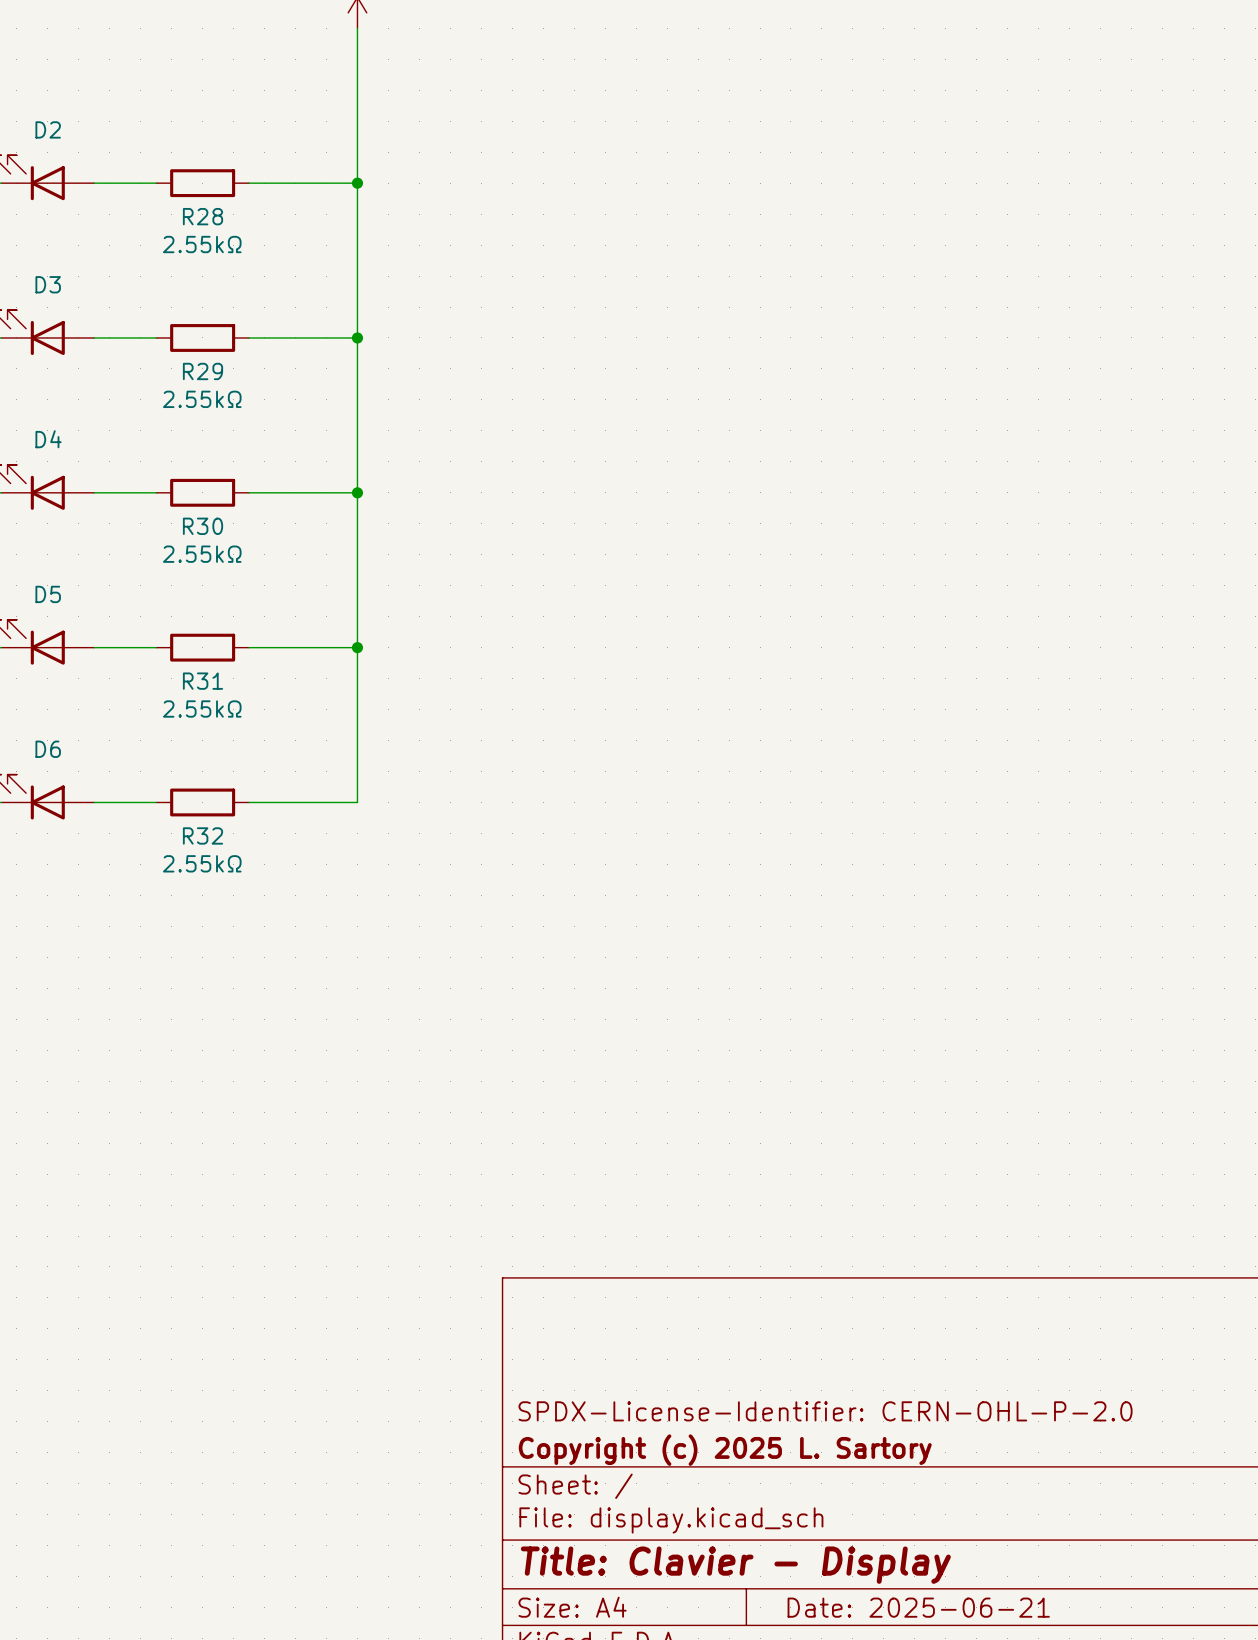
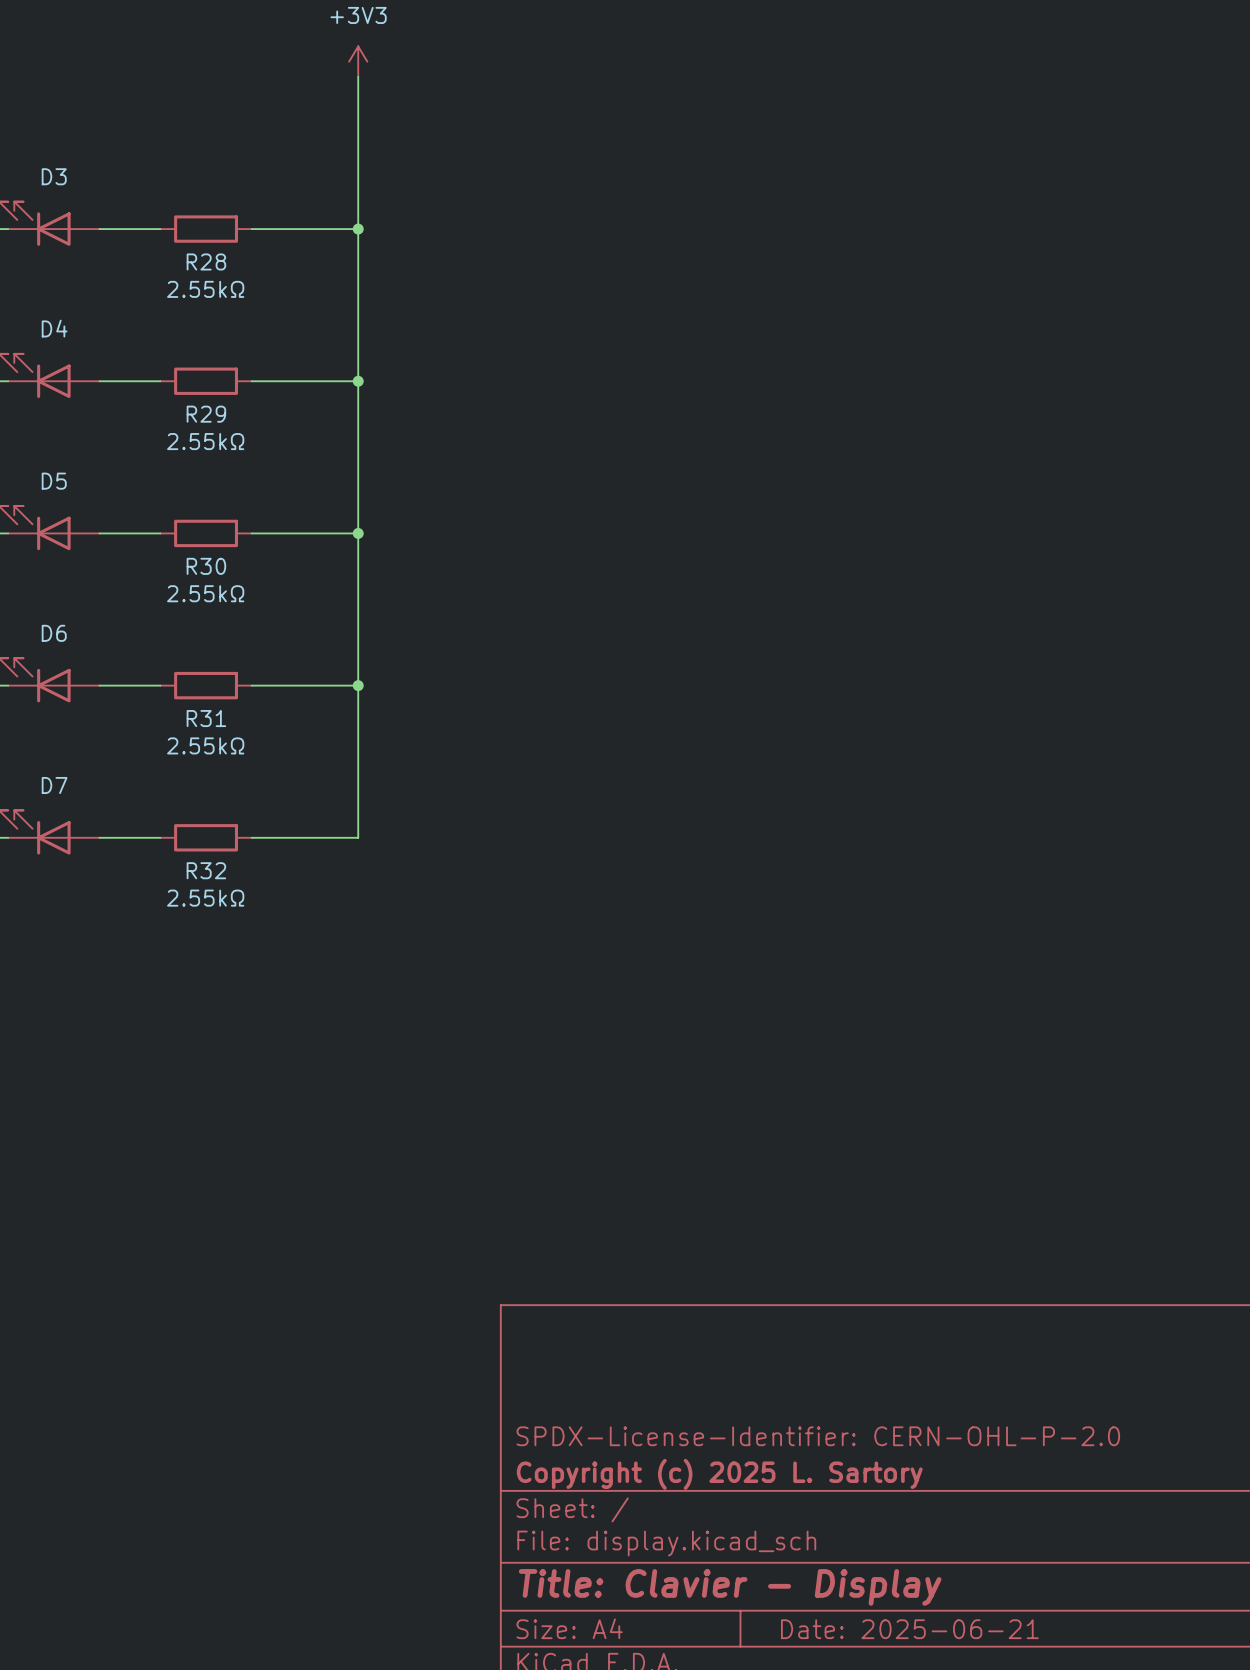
D2 name: D2 (48, 129) -> D3 (54, 176)
D3 name: D3 (48, 284) -> D4 (54, 328)
D4 name: D4 (48, 439) -> D5 (54, 481)
D5 name: D5 (48, 594) -> D6 (54, 633)
D6 name: D6 (48, 749) -> D7 (54, 785)

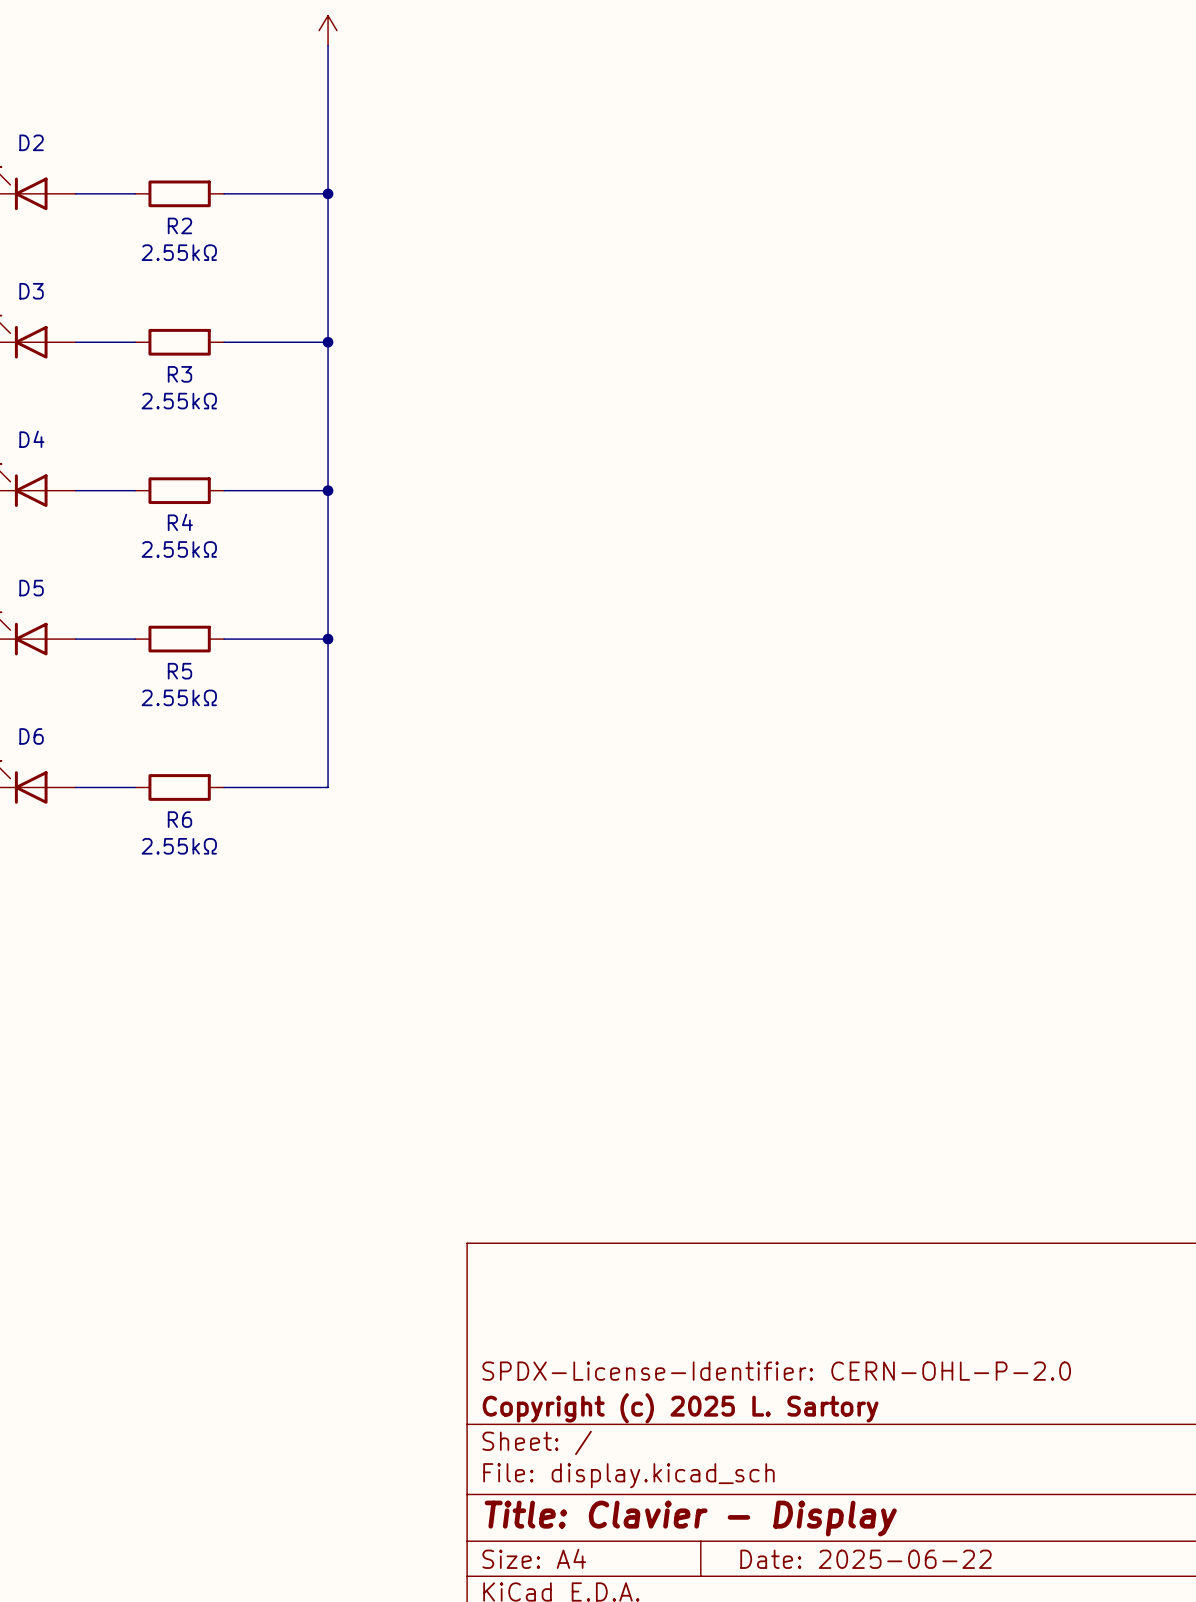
D3 name: D3 (54, 176) -> D2 (31, 142)
R28 name: R28 (206, 261) -> R2 (179, 225)
D4 name: D4 (54, 328) -> D3 (31, 291)
R29 name: R29 (206, 414) -> R3 (179, 374)
D5 name: D5 (54, 481) -> D4 (31, 439)
R30 name: R30 (206, 566) -> R4 (180, 522)
D6 name: D6 (54, 633) -> D5 (31, 588)
R31 name: R31 (206, 718) -> R5 (179, 671)
D7 name: D7 (54, 785) -> D6 (31, 736)
R32 name: R32 (206, 870) -> R6 (179, 819)
title block: Date: 2025-06-21 (909, 1629) -> Date: 2025-06-22 (865, 1559)

